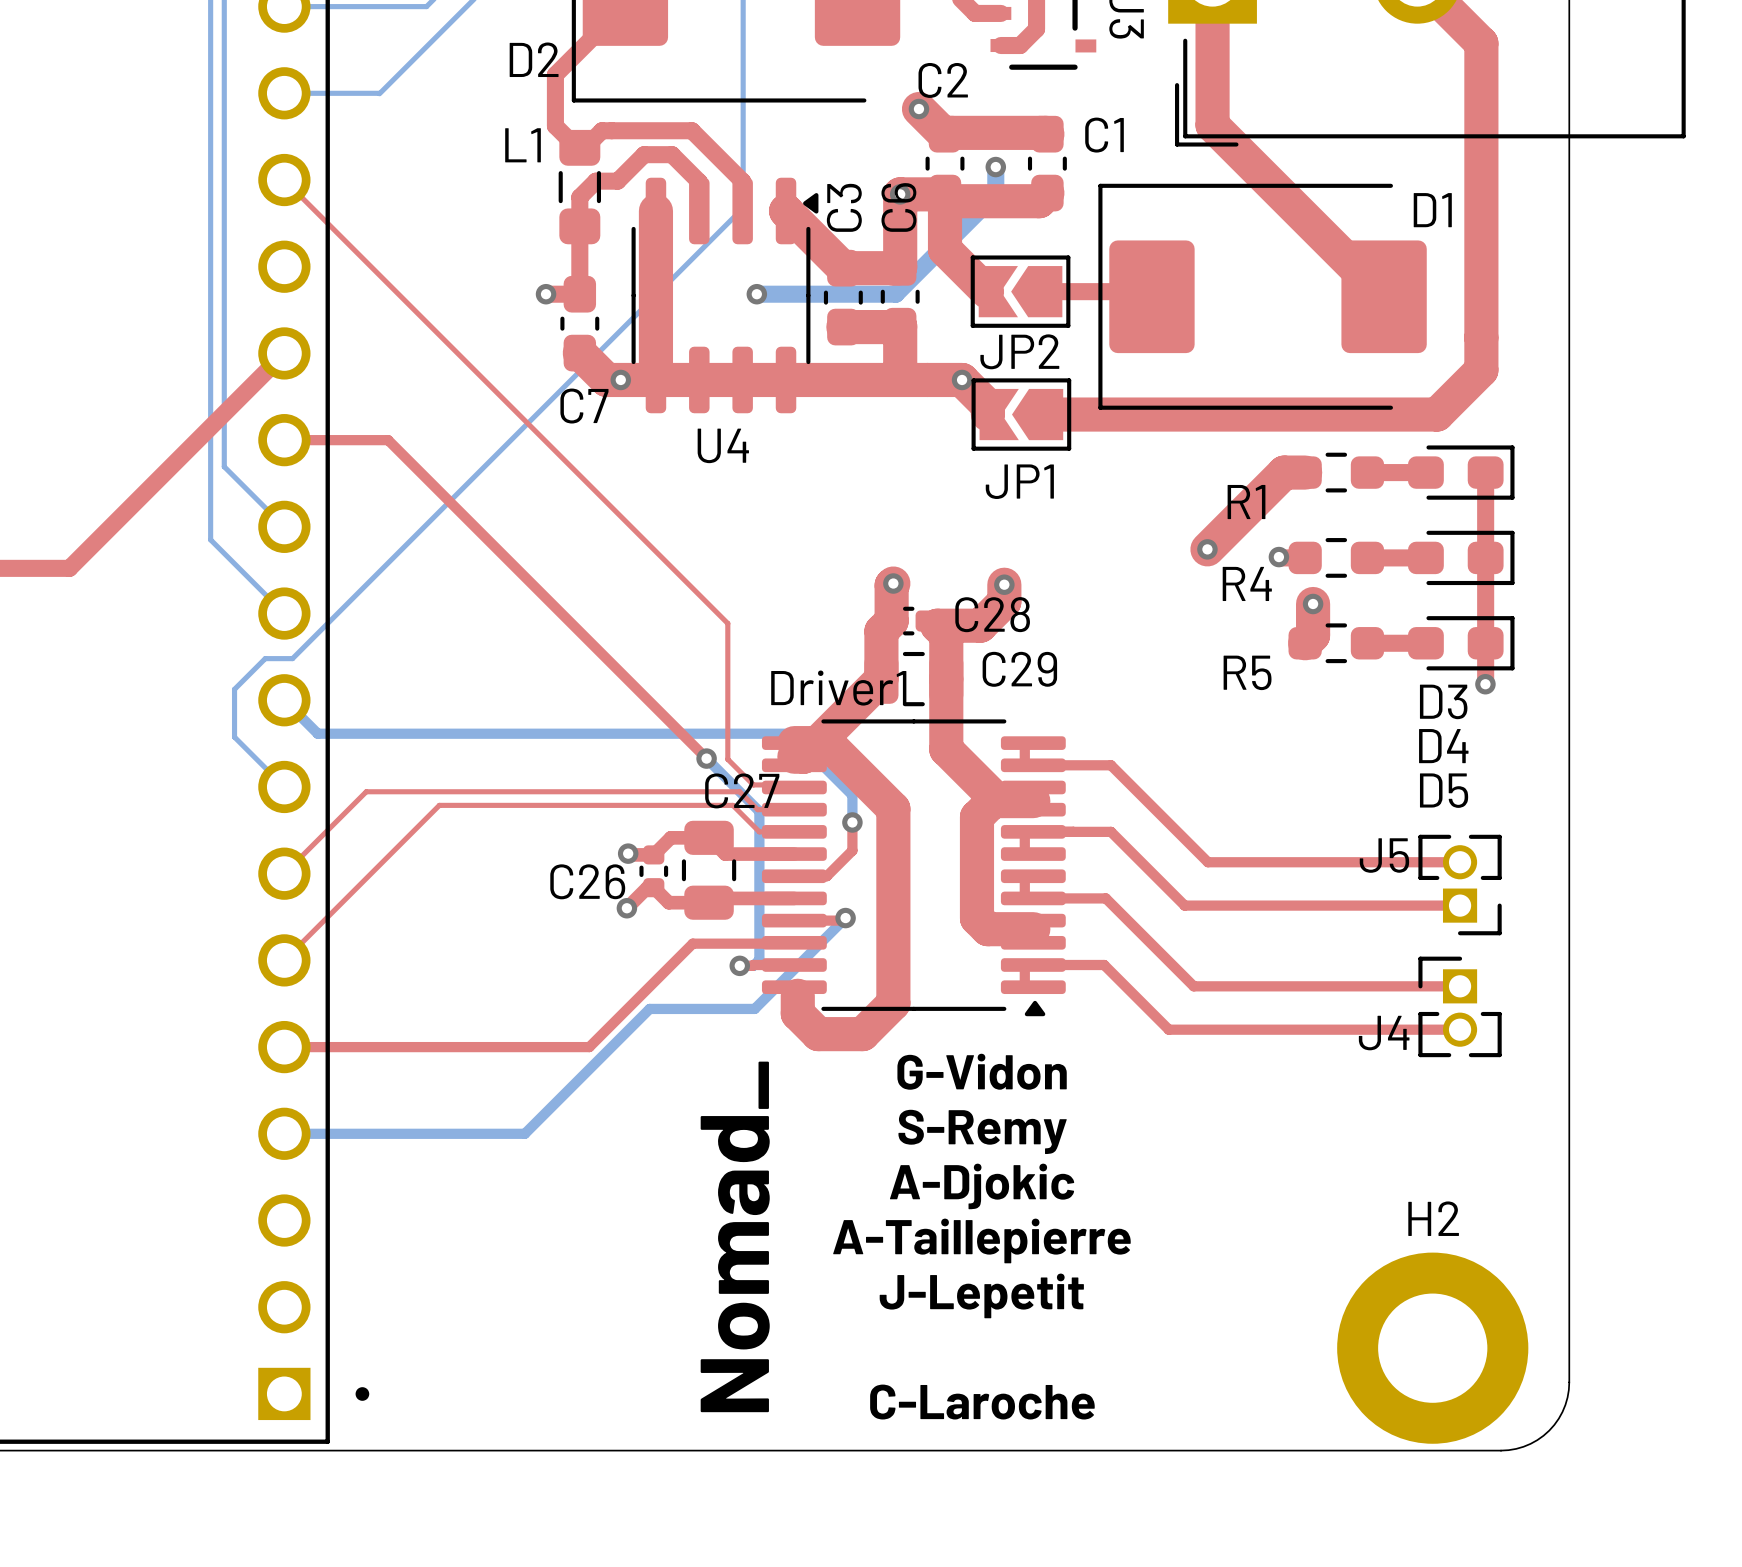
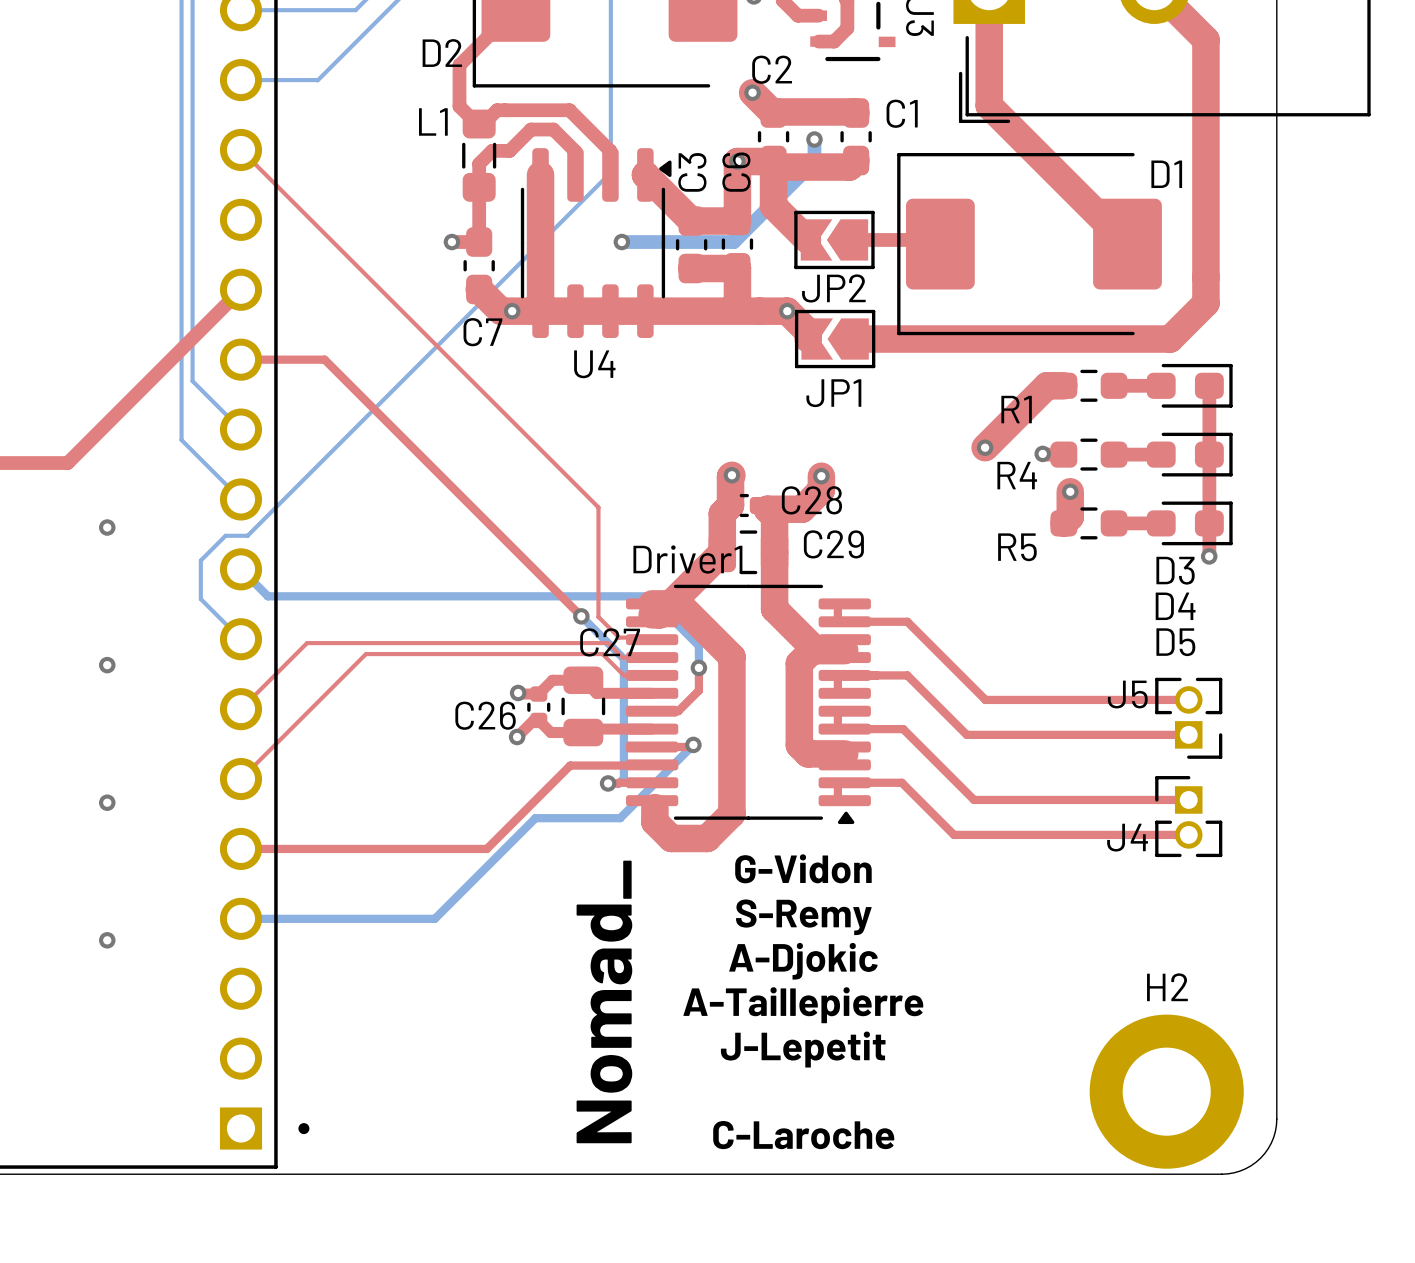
via: none -> (107, 527)
via: none -> (107, 665)
via: none -> (107, 802)
via: none -> (107, 940)

